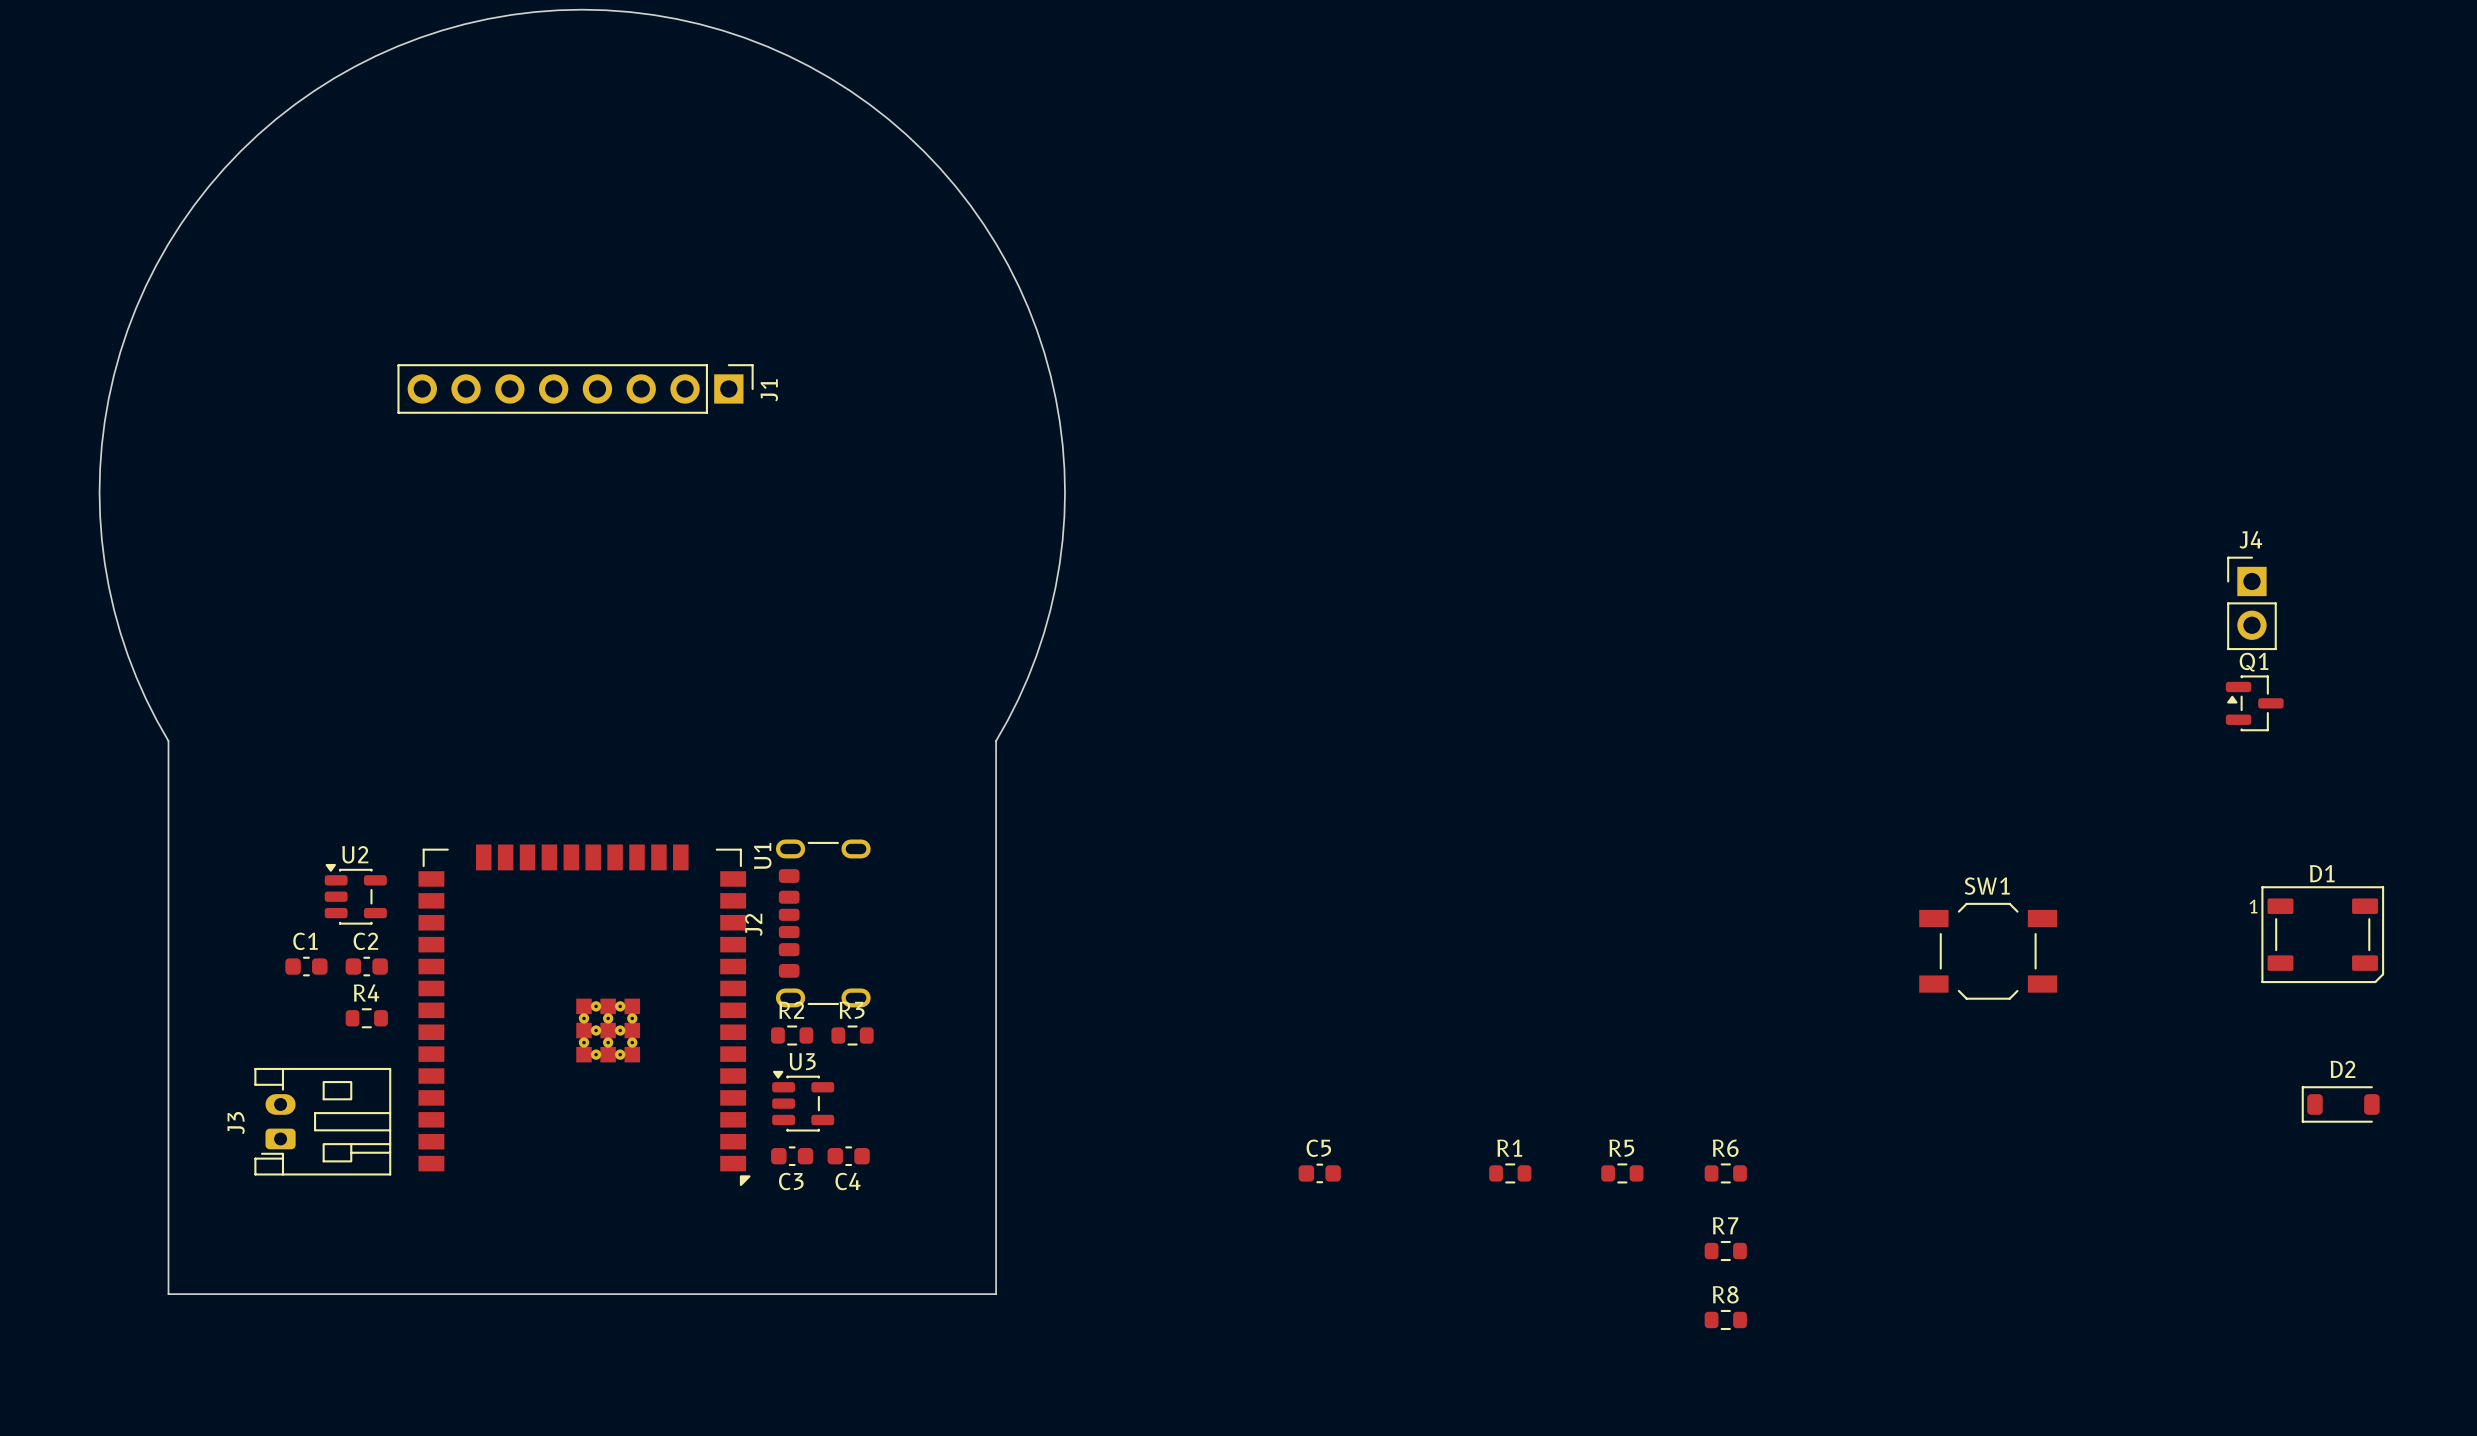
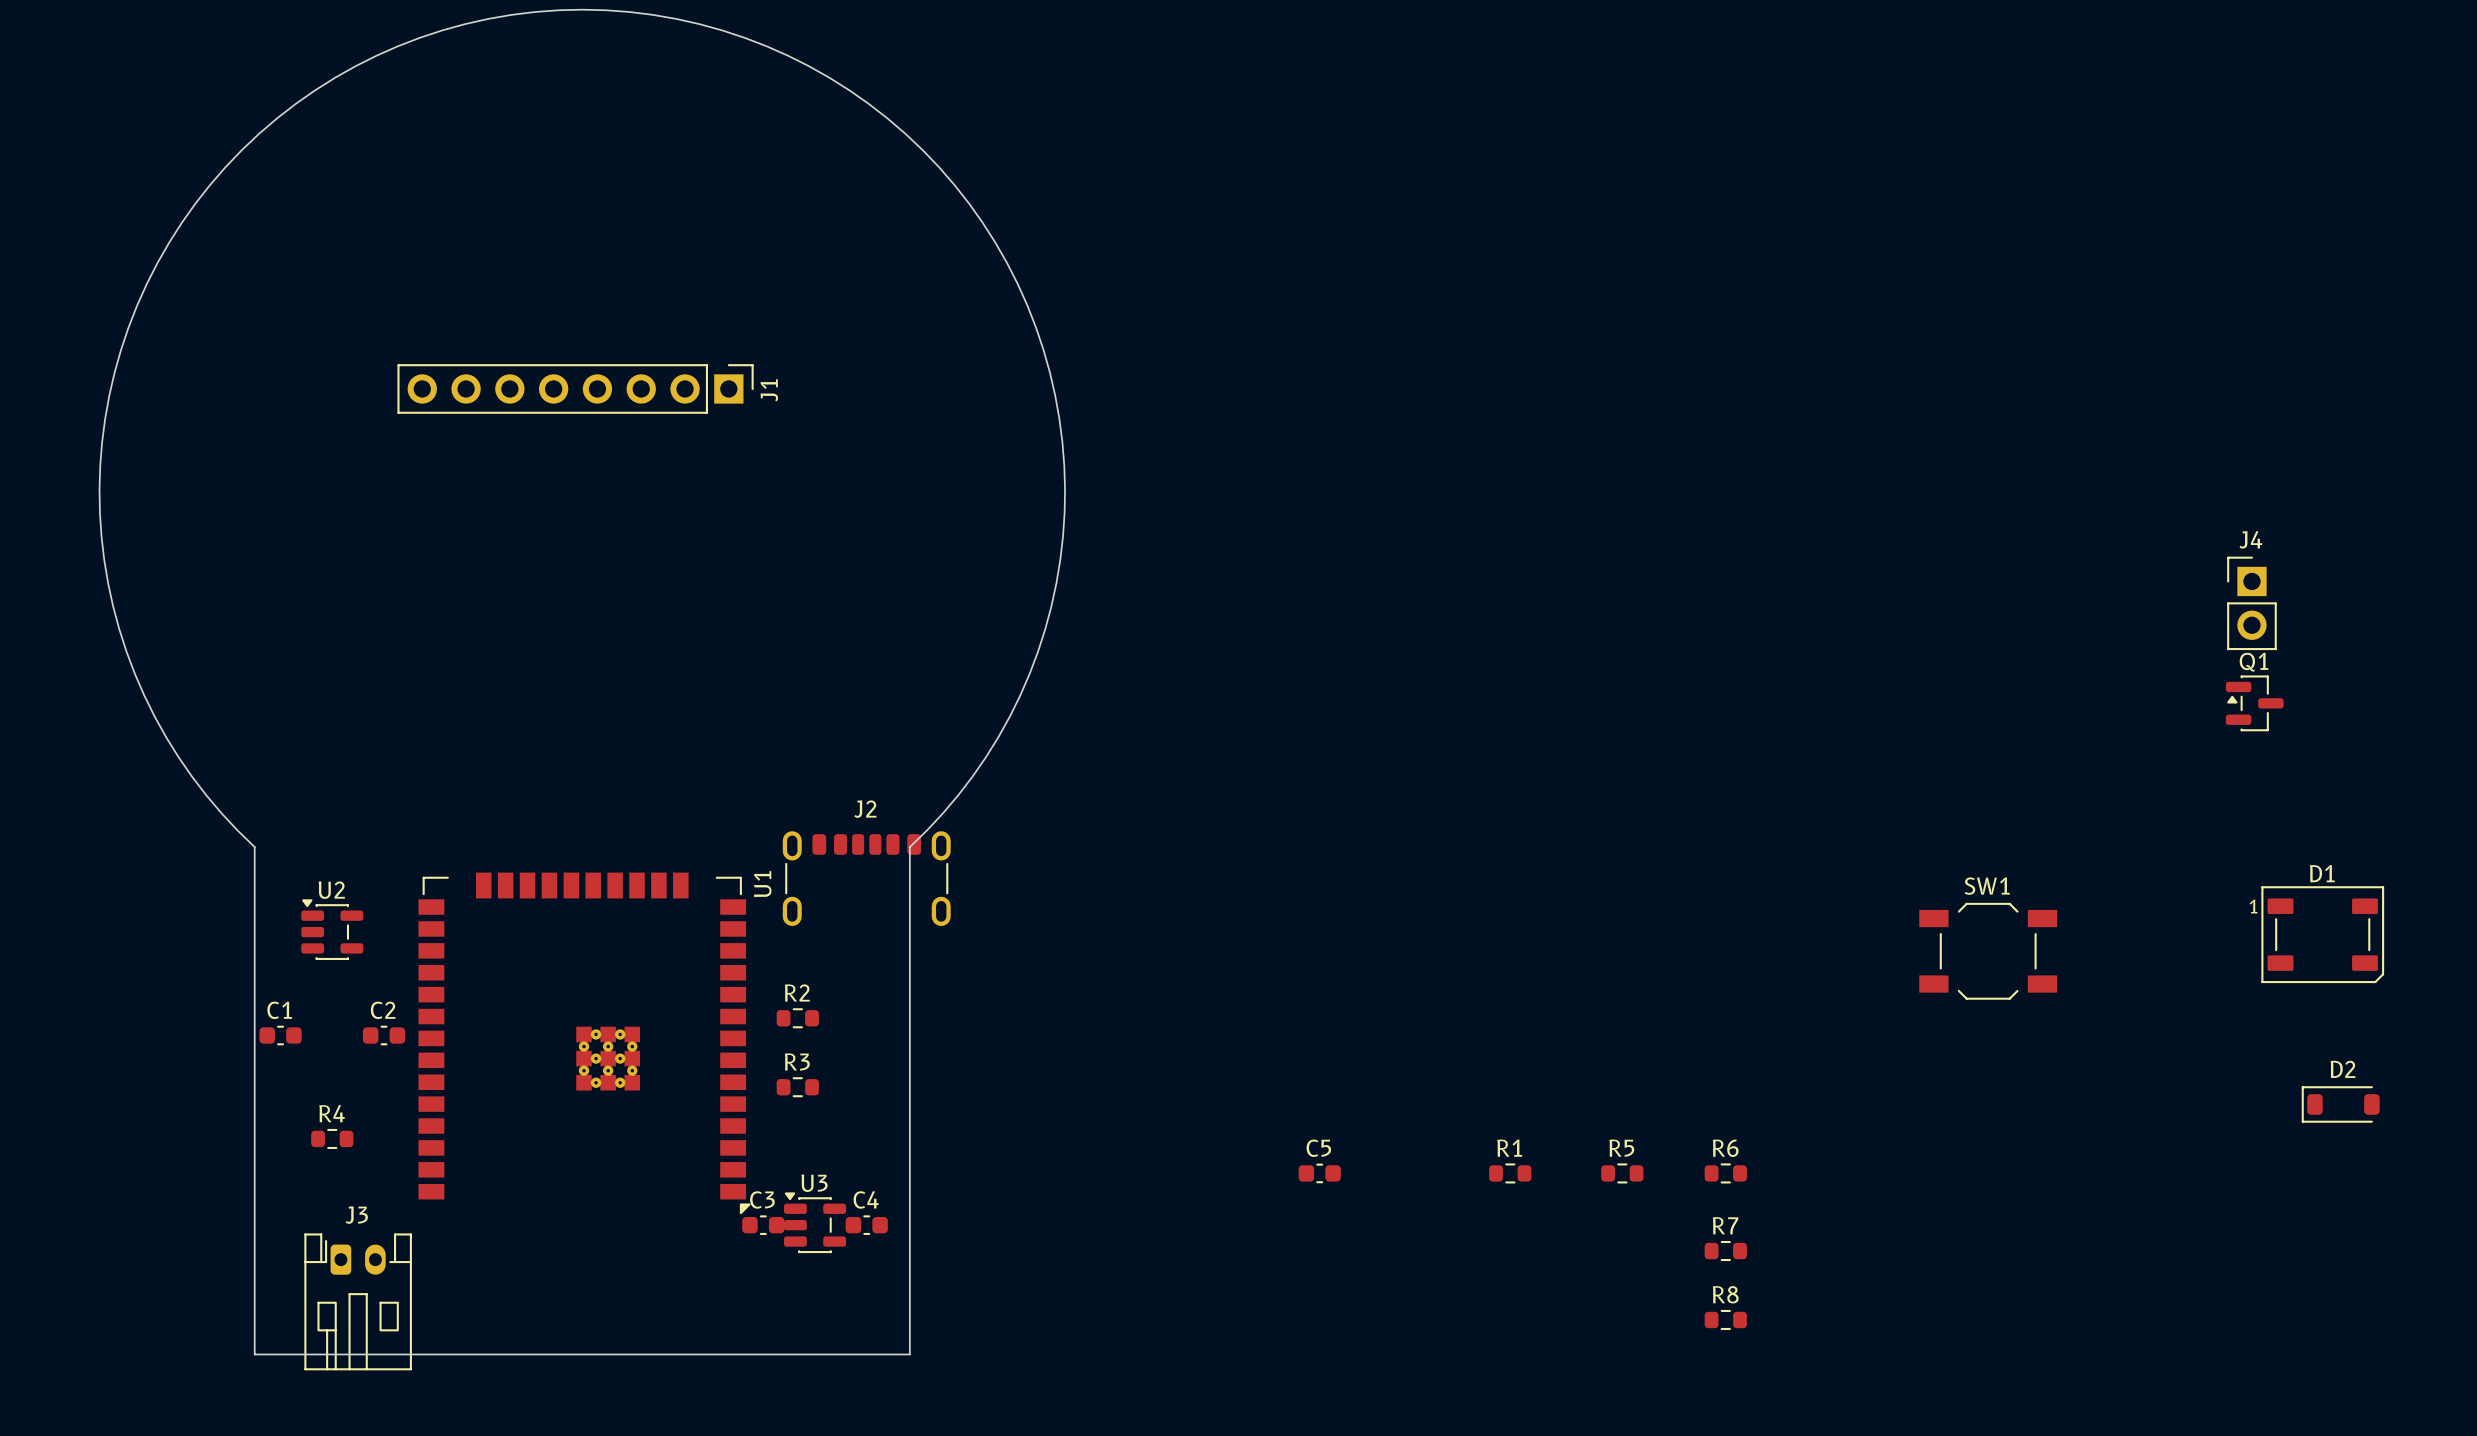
board edge: (168, 741) (168, 1294) (996, 1294) (996, 741) (1028, 677) (1050, 610) (1062, 540) (1065, 492) (1062, 445) (1055, 398) (1044, 352) (1028, 307) (996, 244) (970, 205) (940, 168) (888, 119) (850, 91) (809, 66) (767, 46) (699, 24) (629, 12) (558, 10) (511, 14) (464, 24) (397, 46) (354, 66) (313, 91) (257, 134) (224, 168) (194, 205) (156, 265) (127, 330) (113, 375) (104, 421) (99, 492) (101, 540) (108, 587) (120, 632) (136, 677) (168, 741) -> (254, 847) (221, 813) (192, 776) (166, 737) (144, 695) (126, 651) (113, 606) (104, 560) (99, 513) (100, 465) (105, 418) (114, 372) (128, 327) (146, 284) (169, 242) (195, 203) (225, 167) (259, 133) (295, 103) (334, 77) (376, 55) (420, 37) (465, 24) (511, 14) (558, 10) (605, 10) (652, 14) (699, 24) (744, 37) (787, 55) (829, 77) (868, 103) (905, 133) (938, 167) (968, 203) (995, 242) (1027, 305) (1043, 349) (1055, 395) (1062, 442) (1065, 489) (1063, 536) (1056, 583) (1045, 629) (1020, 695) (998, 737) (972, 776) (942, 813) (909, 847) (909, 1354) (254, 1354) (254, 847)
U2 position: (355, 894) -> (332, 929)
J2 rotation: 0° (823, 923) -> 90° clockwise (866, 878)
C1 position: (306, 966) -> (280, 1035)
C2 position: (366, 966) -> (384, 1035)
U1 position: (584, 1015) -> (584, 1043)
R4 position: (366, 1018) -> (332, 1138)
R2 position: (792, 1035) -> (797, 1018)
R3 position: (852, 1035) -> (797, 1087)
U3 position: (803, 1101) -> (815, 1222)
J3 rotation: 0° (322, 1121) -> 90° clockwise (358, 1301)
J3 position: (322, 1121) -> (358, 1301)
C3 position: (792, 1156) -> (763, 1225)
C4 position: (848, 1156) -> (866, 1225)
C3 name position: C3 (791, 1181) -> C3 (762, 1199)
C4 name position: C4 (848, 1181) -> C4 (866, 1199)

